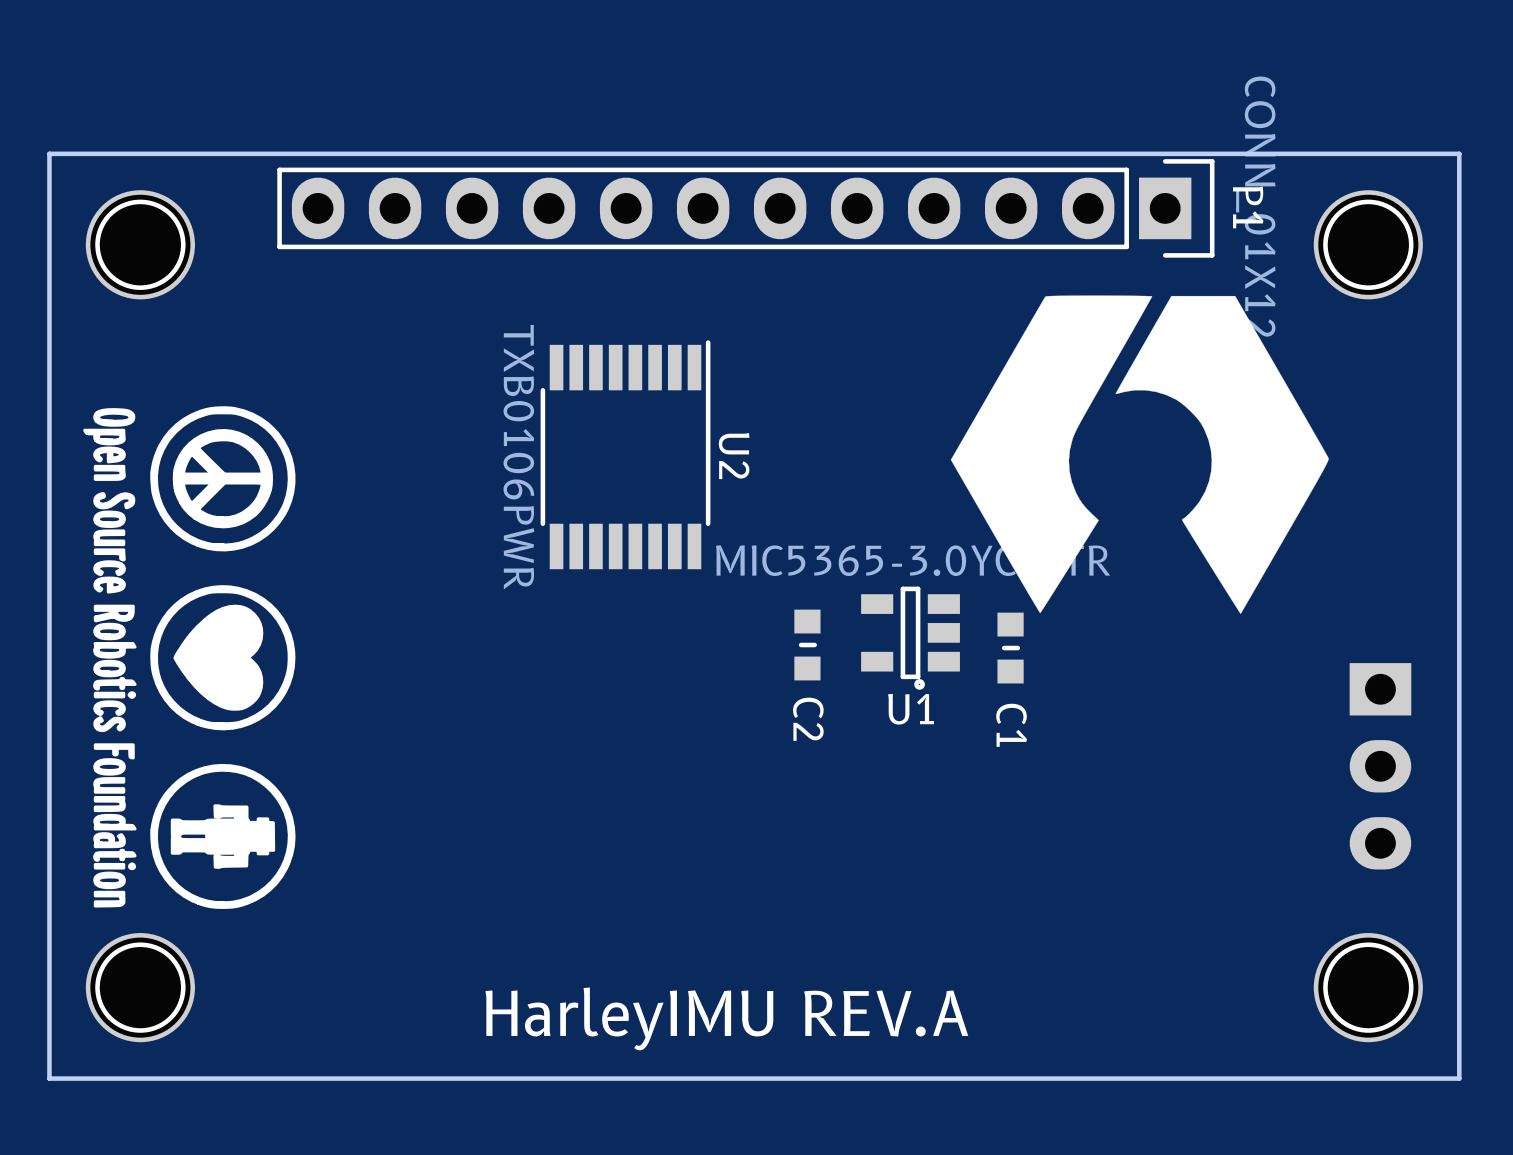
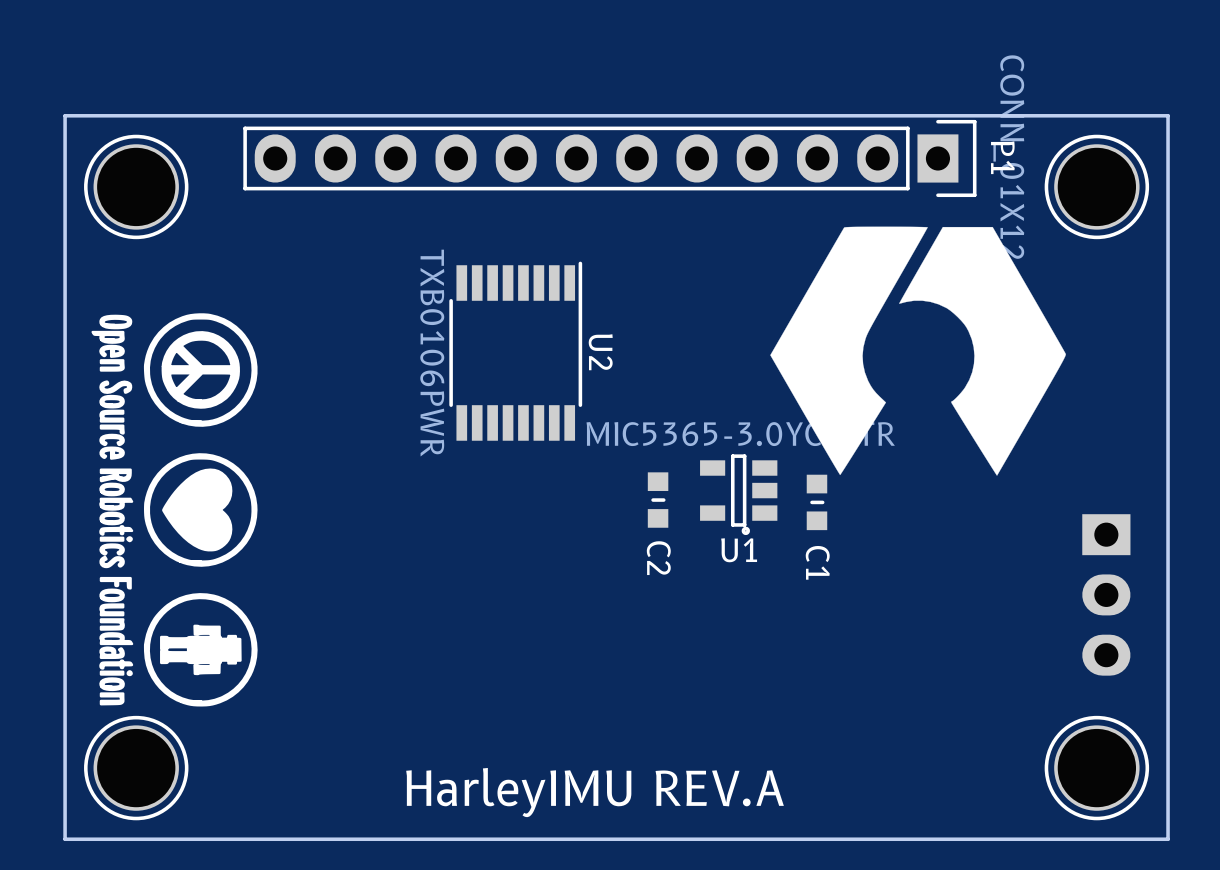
part footprint: [85, 190, 195, 300] -> [84, 134, 189, 240]
part footprint: [1313, 190, 1423, 300] -> [1044, 134, 1150, 240]
part footprint: [85, 933, 195, 1043] -> [84, 715, 189, 821]
part footprint: [1313, 933, 1423, 1043] -> [1044, 715, 1150, 821]

